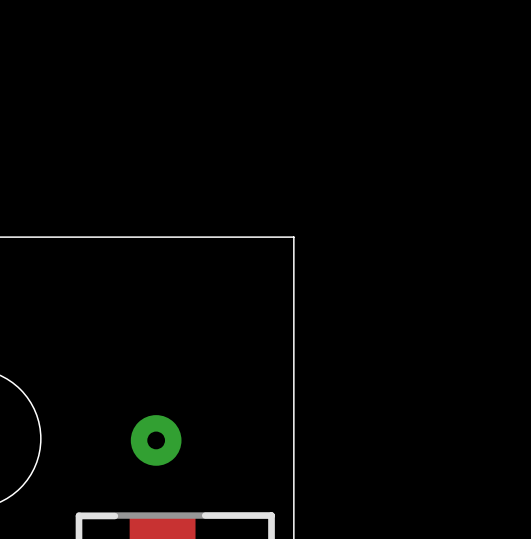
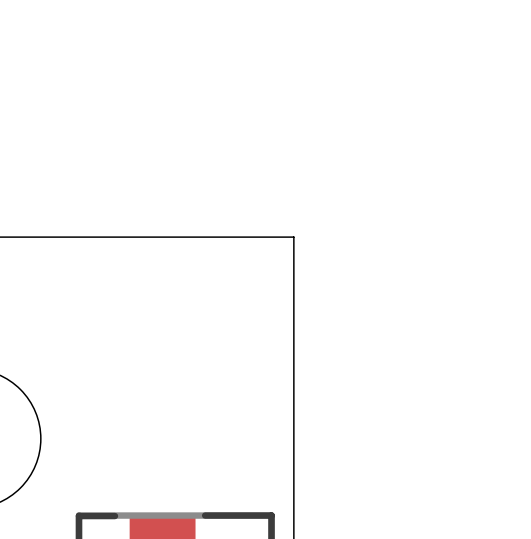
via: (156, 440) -> none

